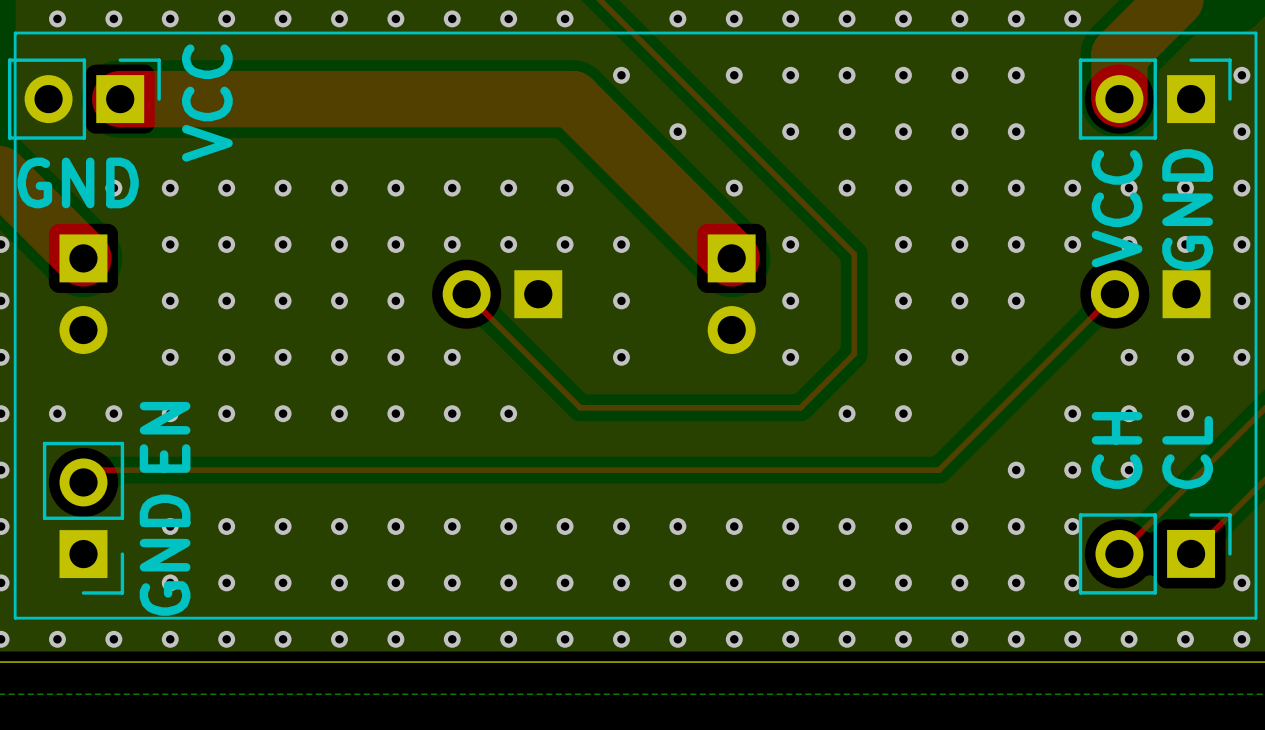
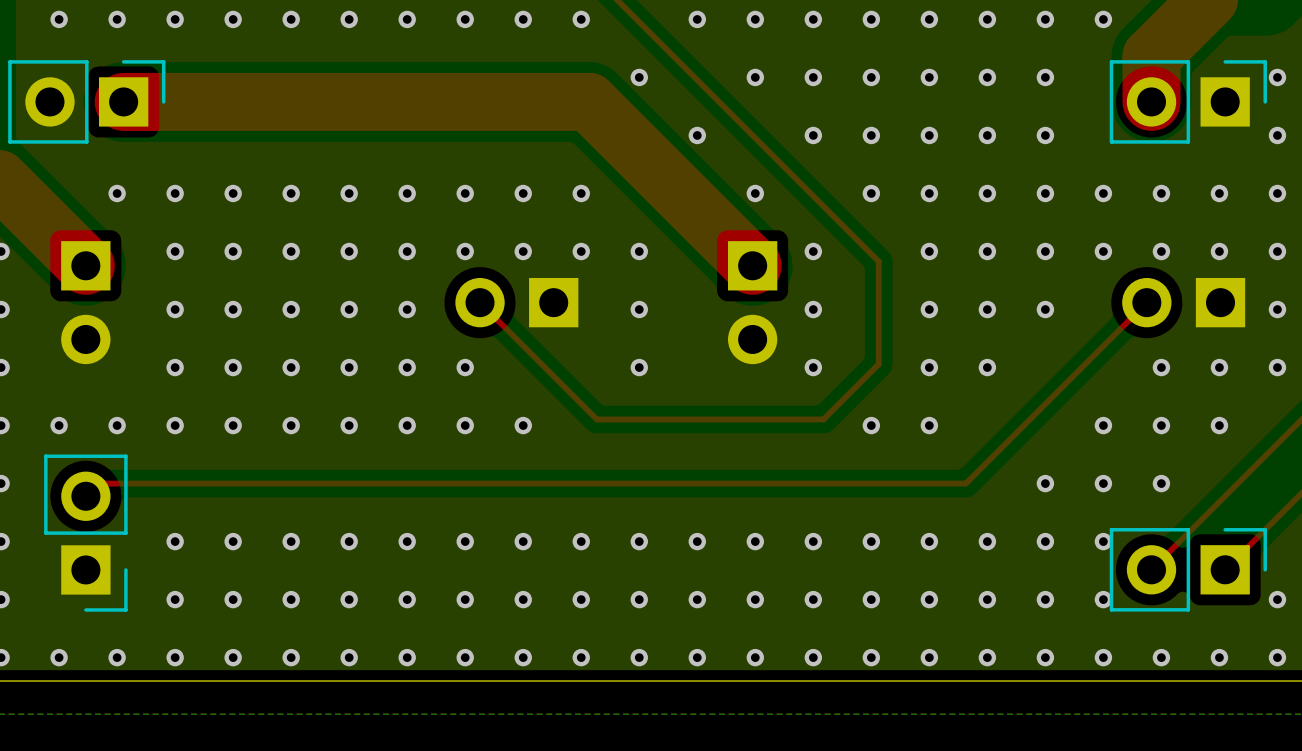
line: (1255, 33) (1255, 618) (15, 618) (15, 33) (1255, 33) -> none
text: VCC (207, 102) -> none
text: GND (78, 182) -> none
text: VCC (1117, 208) -> none
text: GND (1187, 209) -> none
text: EN (165, 437) -> none
text: CH (1117, 450) -> none
text: CL (1187, 452) -> none
text: GND (165, 555) -> none

